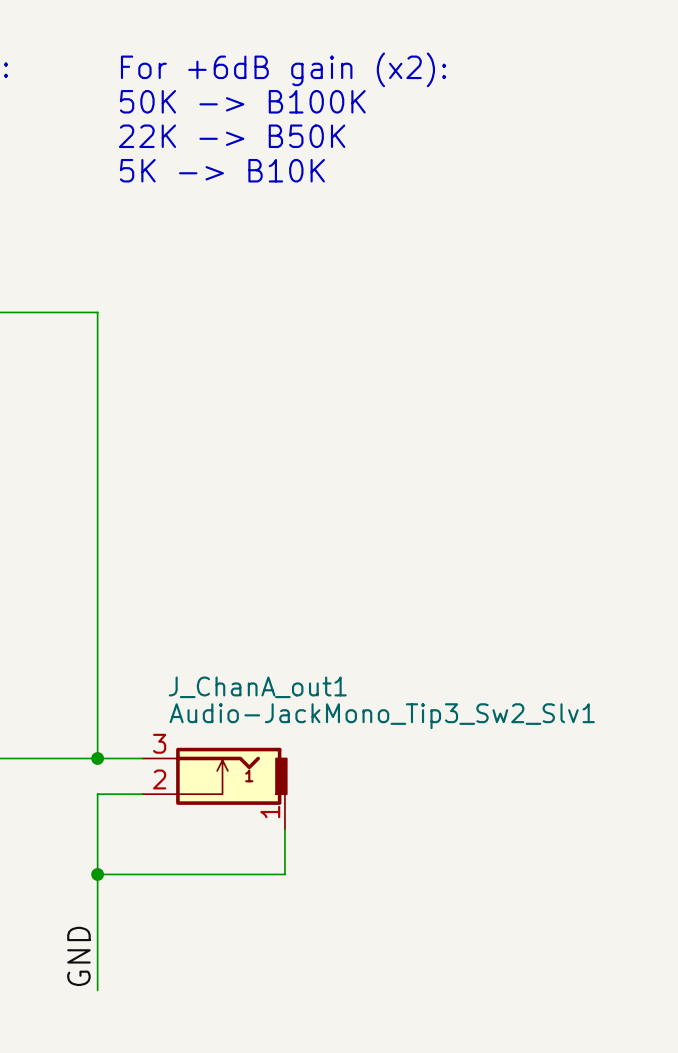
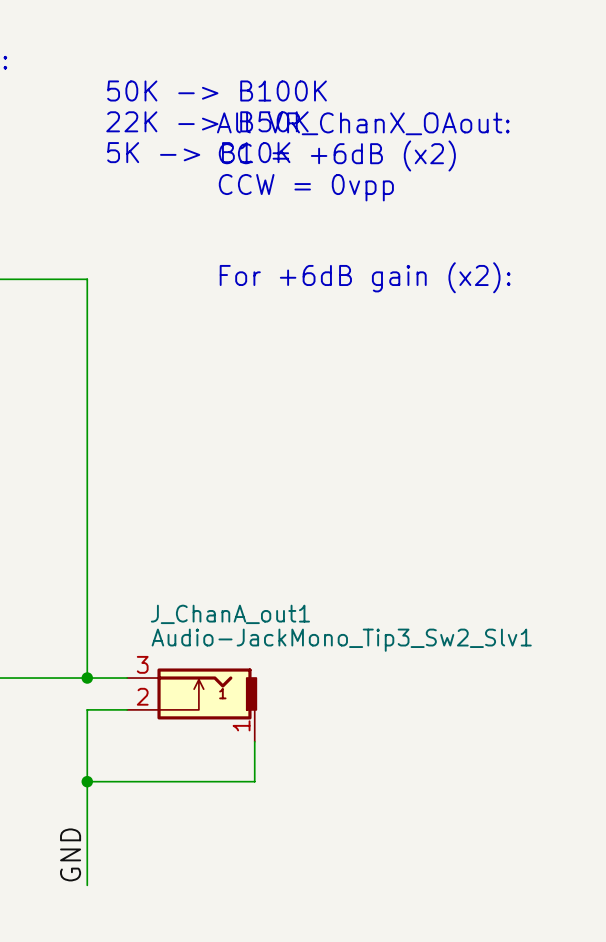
text position: For +6dB gain (x2): (283, 69) -> For +6dB gain (x2): (365, 277)
text: none -> All VR_ChanX_OAout: (363, 123)
text: none -> CC = +6dB (x2) (337, 155)
text: none -> CCW = 0vpp (306, 187)

